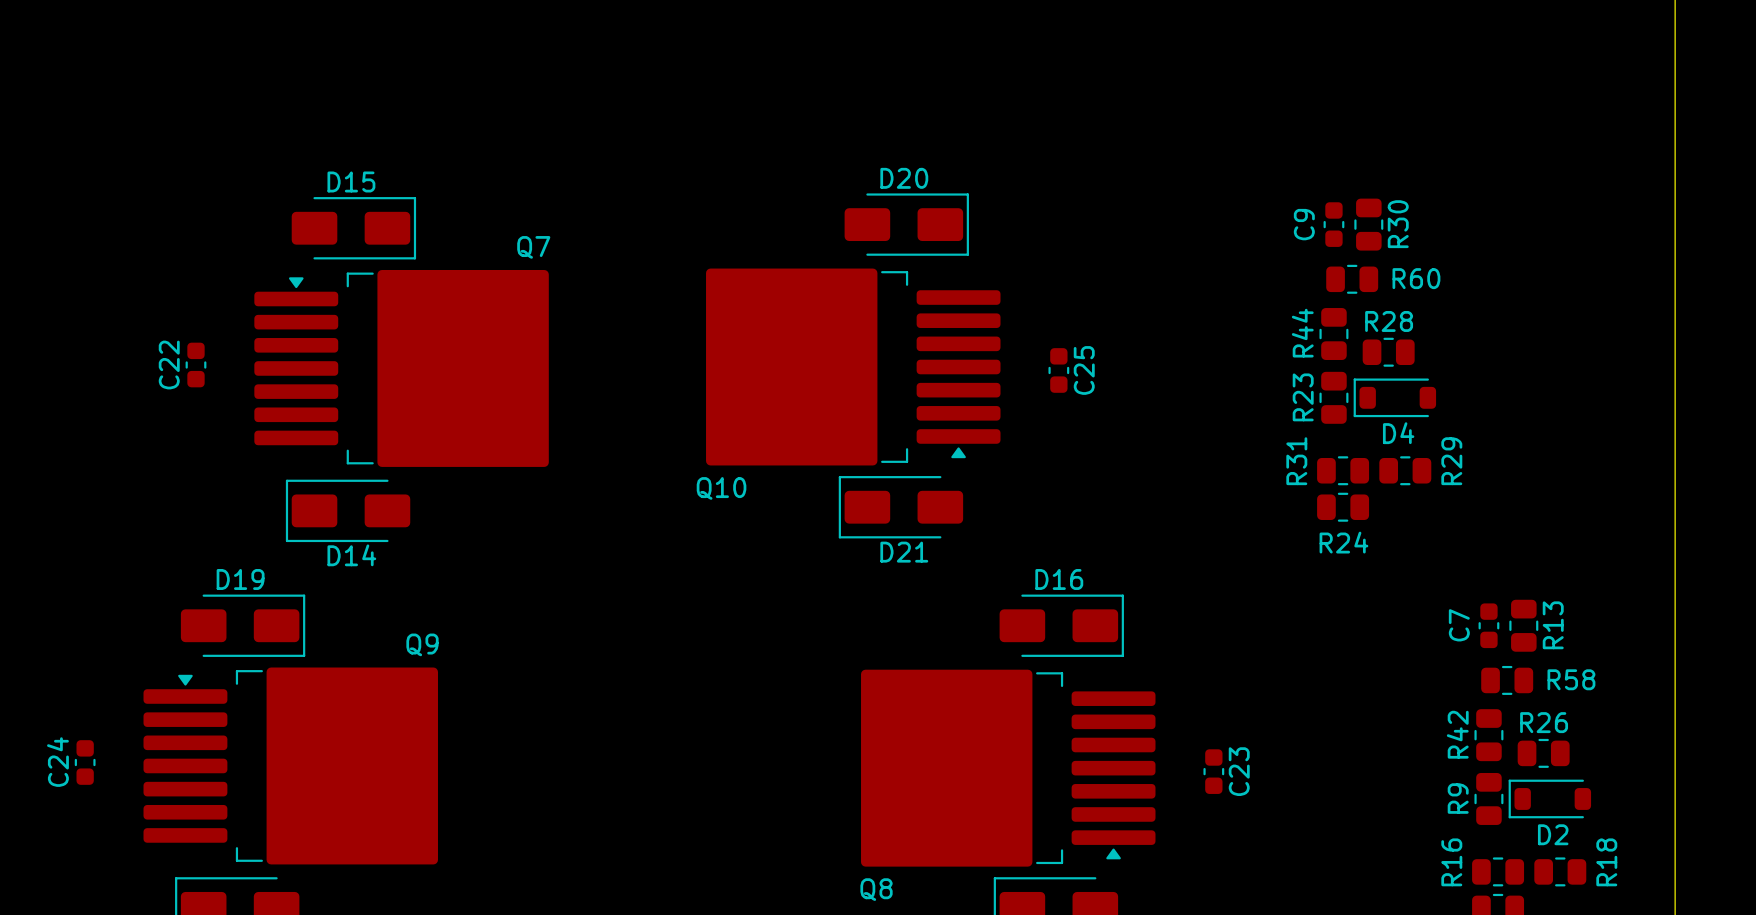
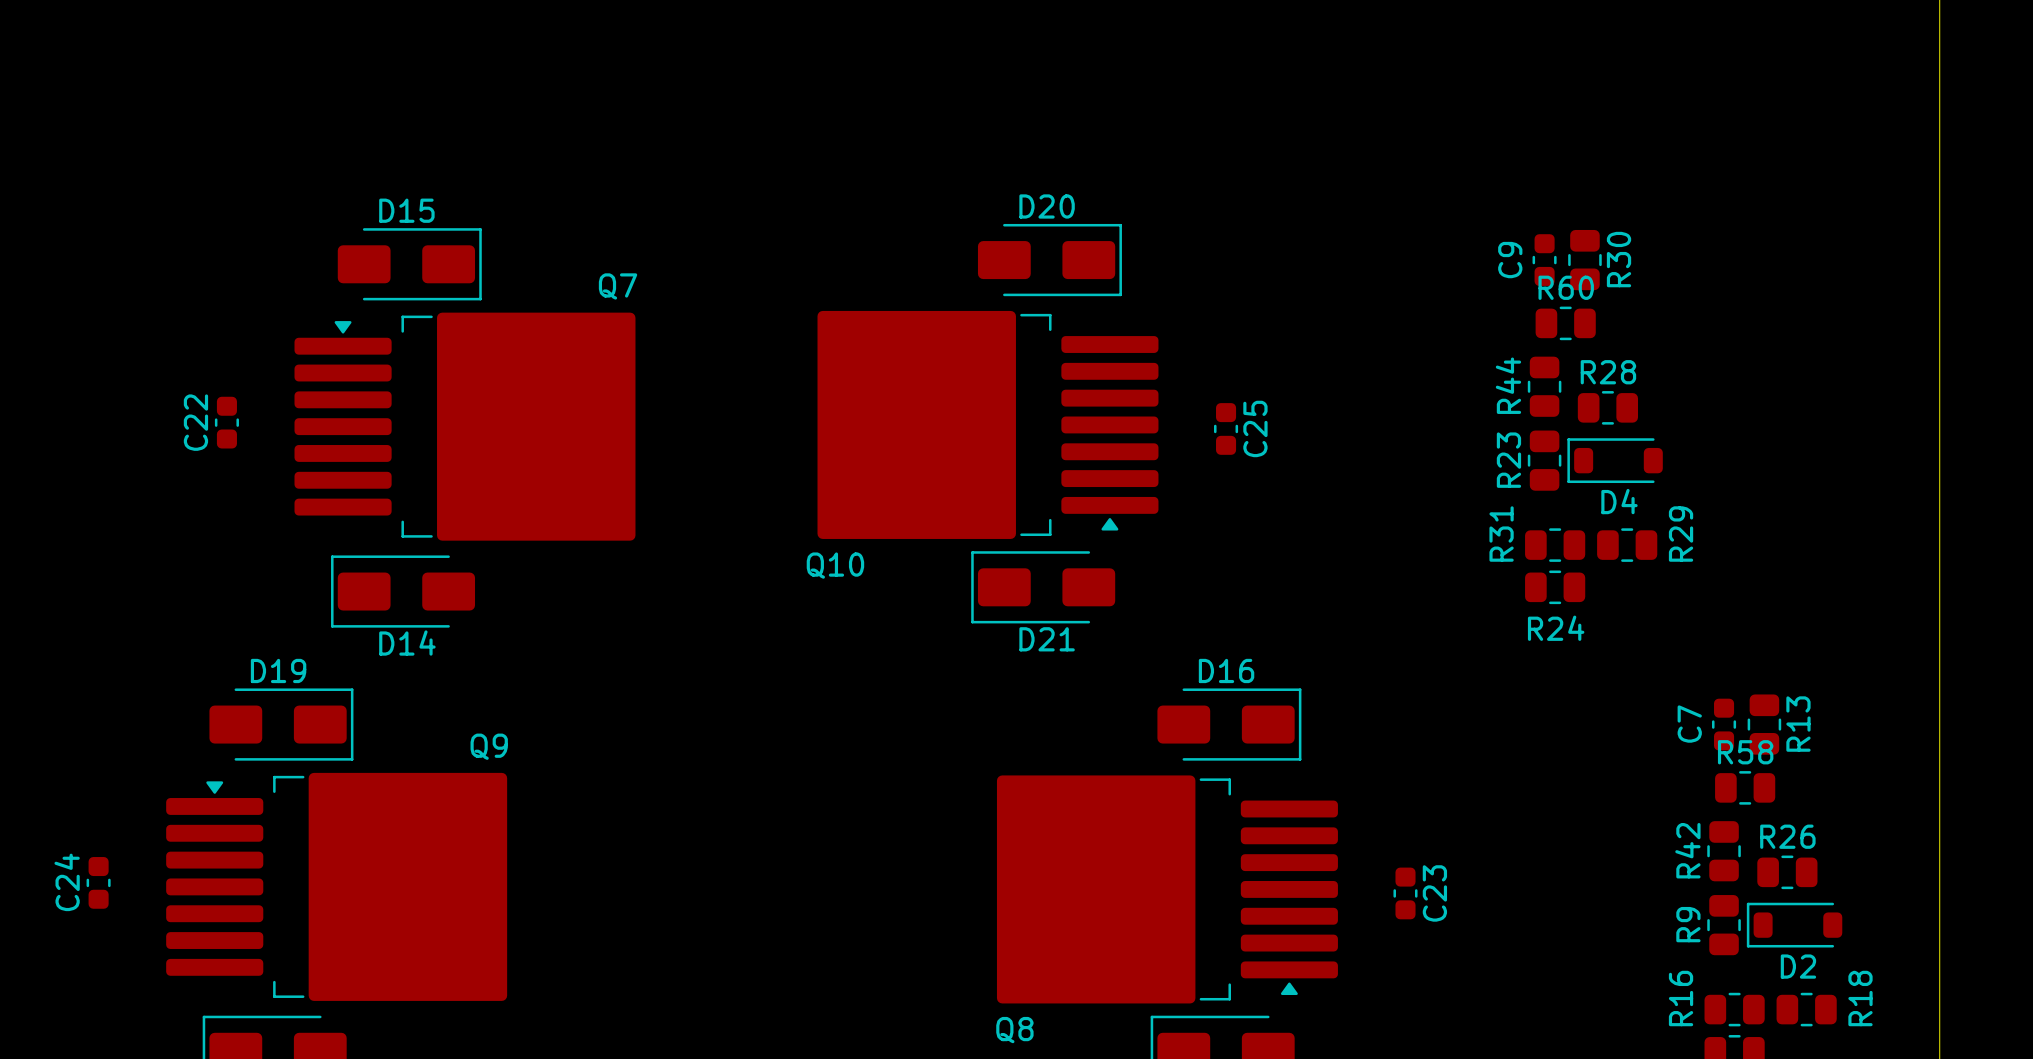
R60 name position: R60 (1416, 278) -> R60 (1566, 287)
R58 name position: R58 (1571, 679) -> R58 (1745, 752)

